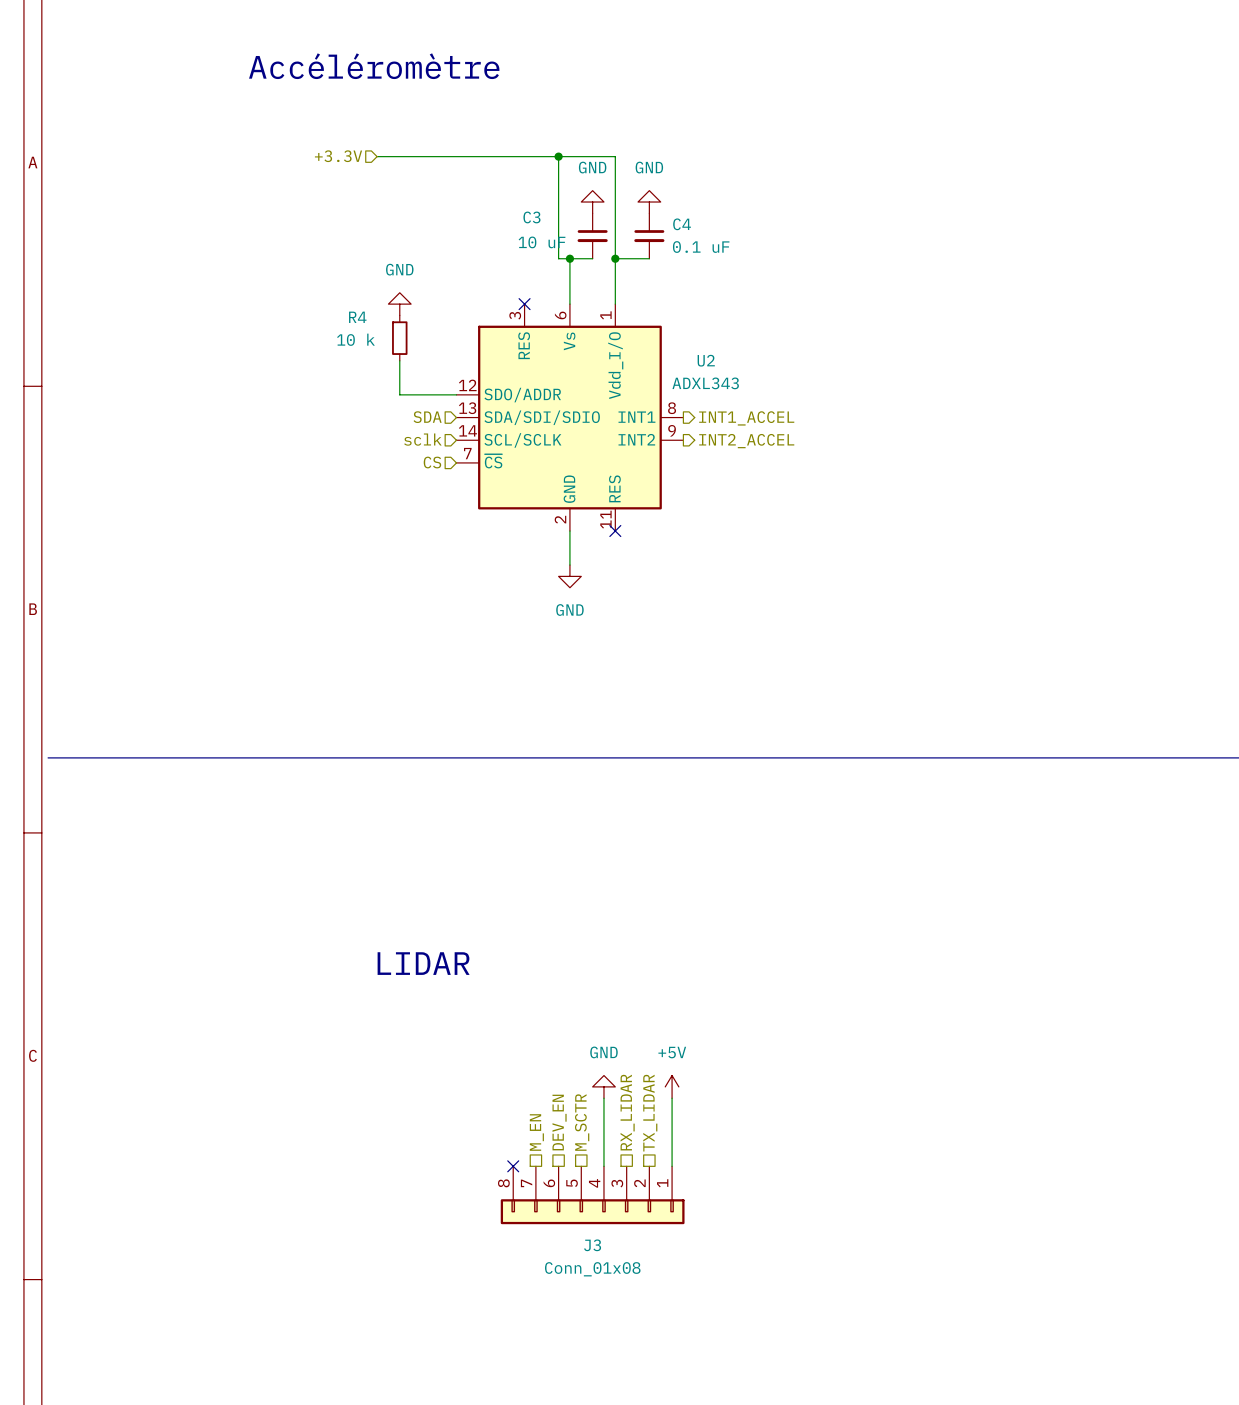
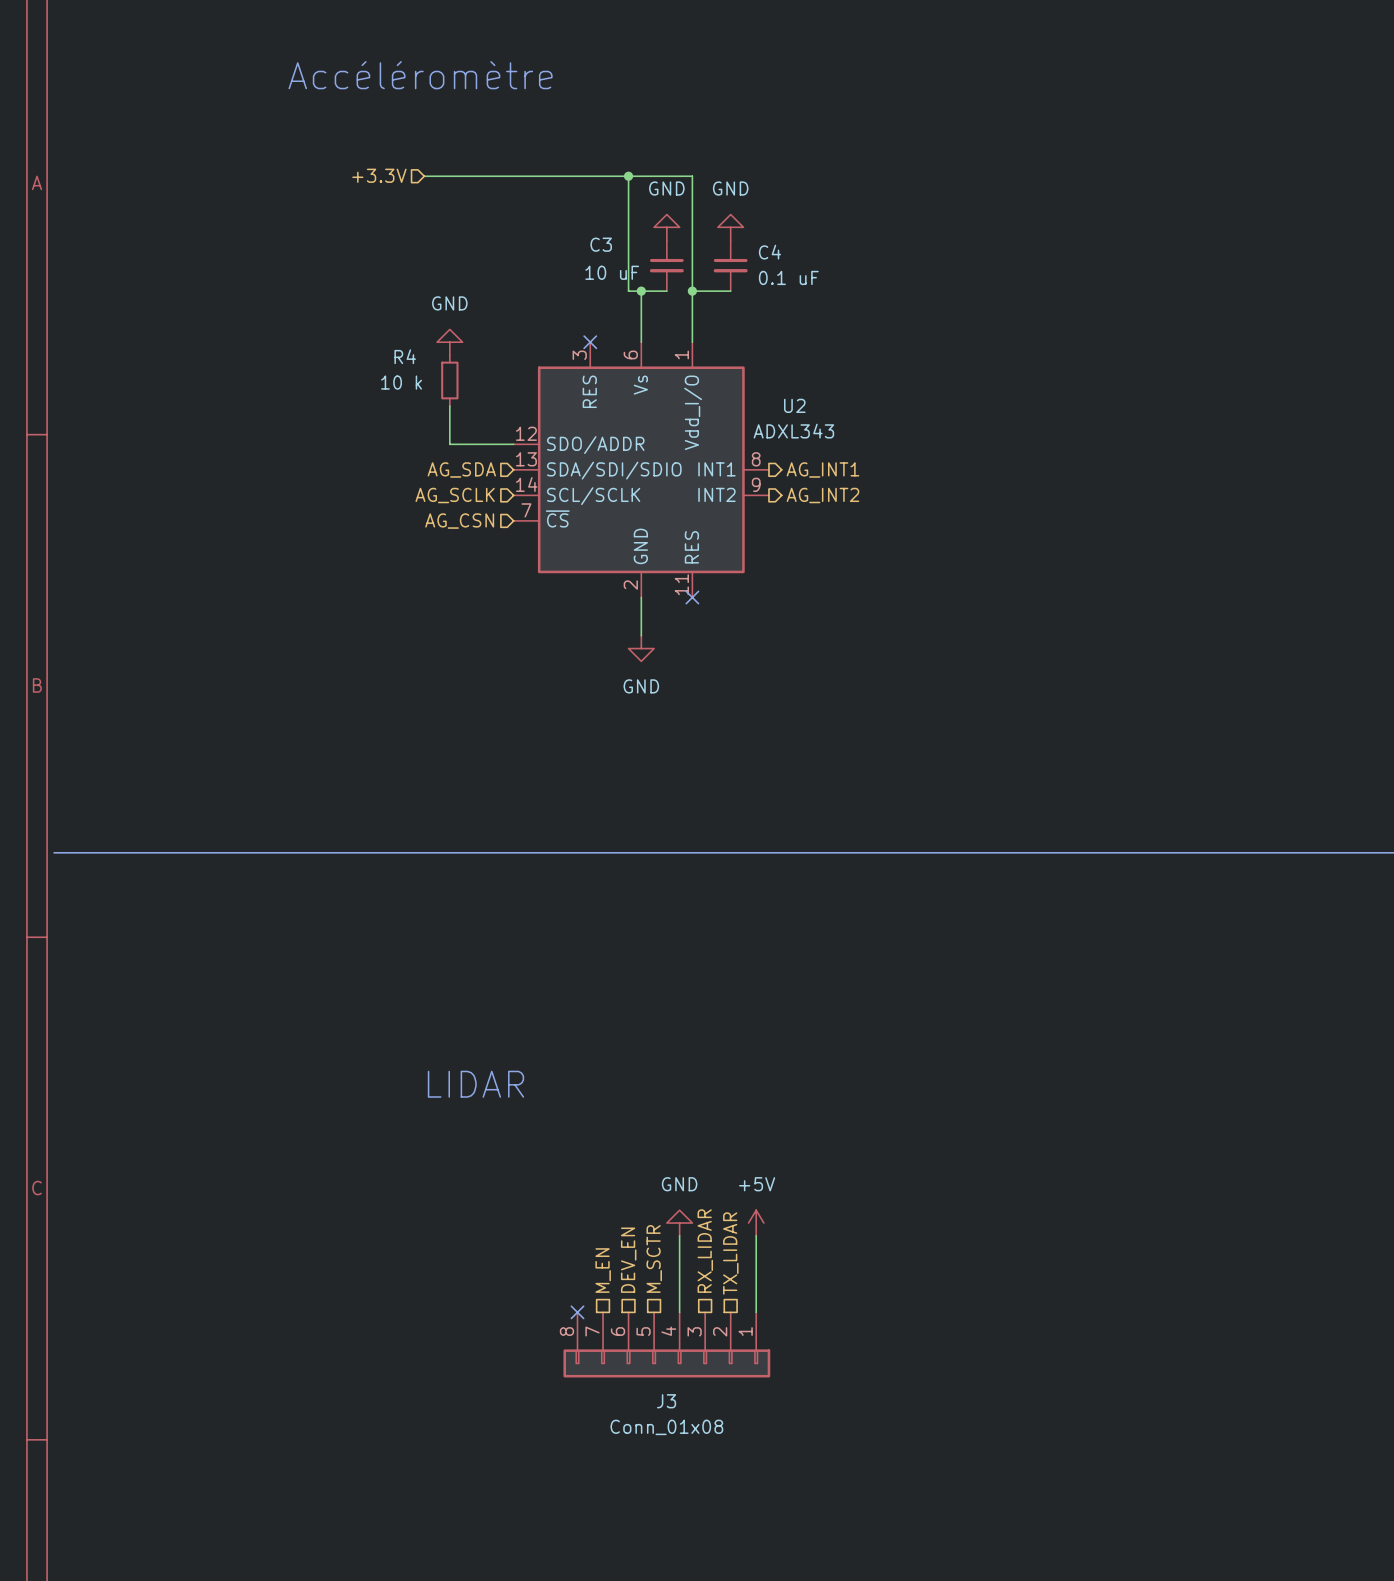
hierarchical label: SDA (427, 417) -> AG_SDA (461, 469)
hierarchical label: INT1_ACCEL (746, 418) -> AG_INT1 (822, 469)
hierarchical label: sclk (422, 439) -> AG_SCLK (455, 495)
hierarchical label: INT2_ACCEL (746, 441) -> AG_INT2 (822, 495)
hierarchical label: CS (432, 462) -> AG_CSN (459, 521)

